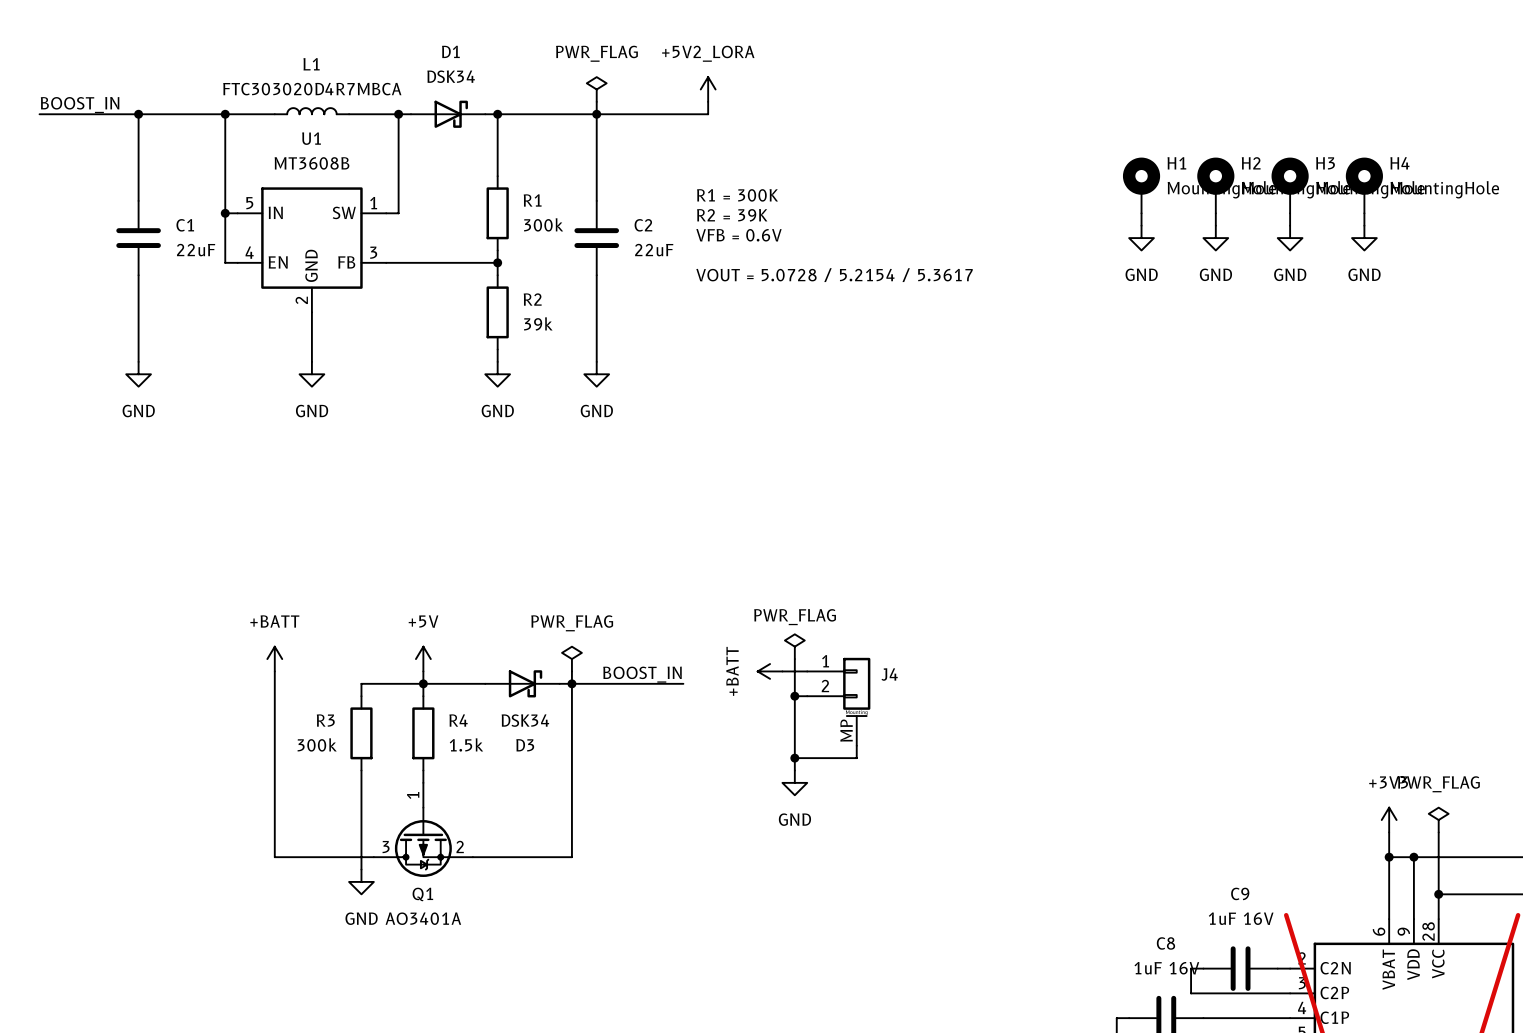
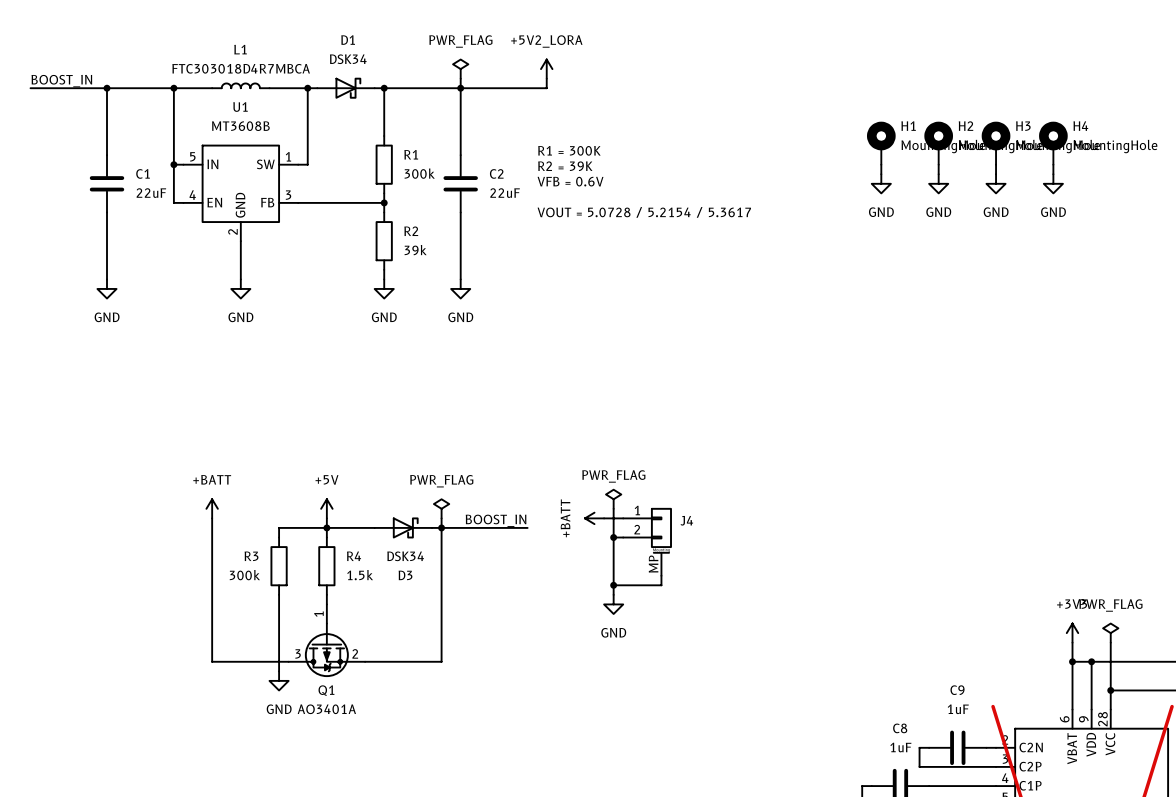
L1 value: FTC303020D4R7MBCA (312, 89) -> FTC303018D4R7MBCA (241, 68)
C9 value: 1uF 16V (1241, 918) -> 1uF (958, 709)
C8 value: 1uF 16V (1166, 968) -> 1uF (900, 747)

